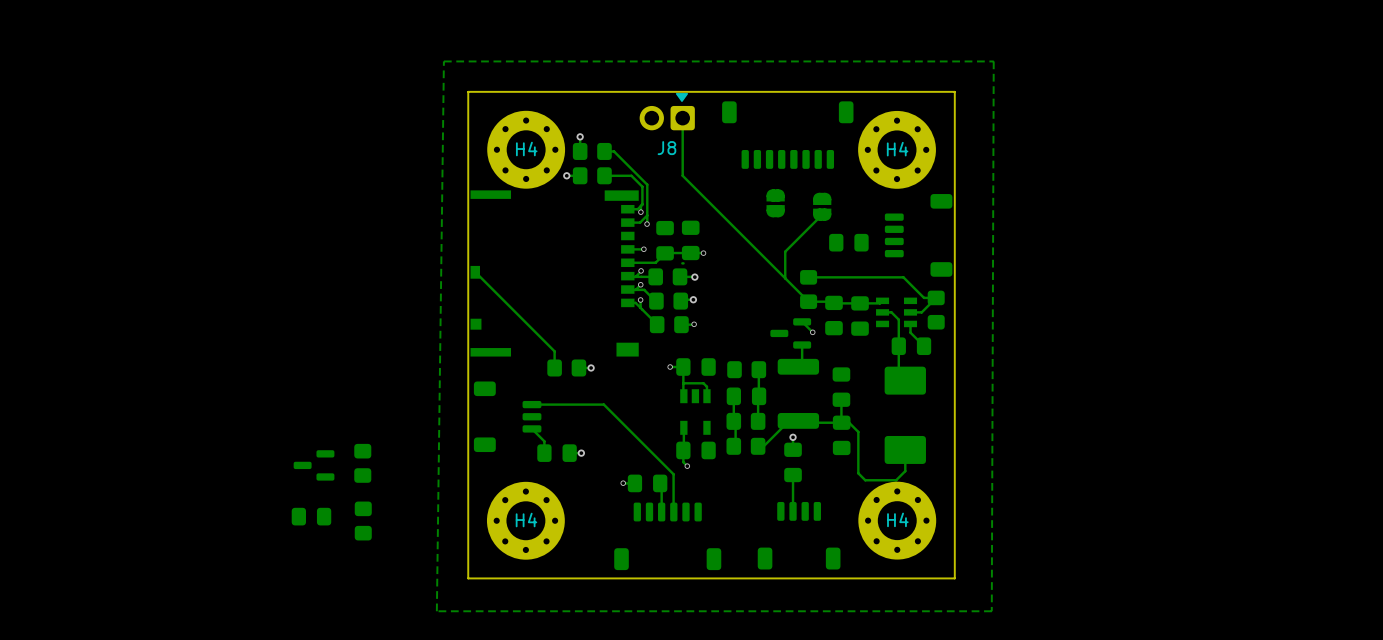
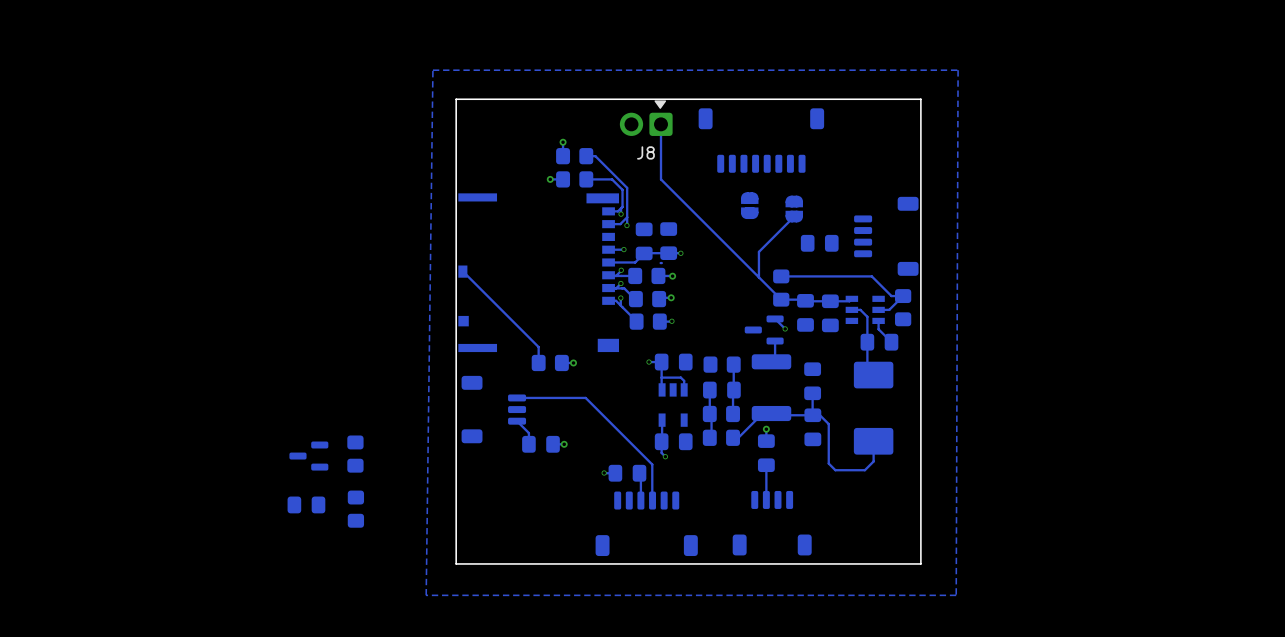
H4: (526, 149) -> none
H4: (897, 149) -> none
H4: (525, 520) -> none
H4: (897, 520) -> none

